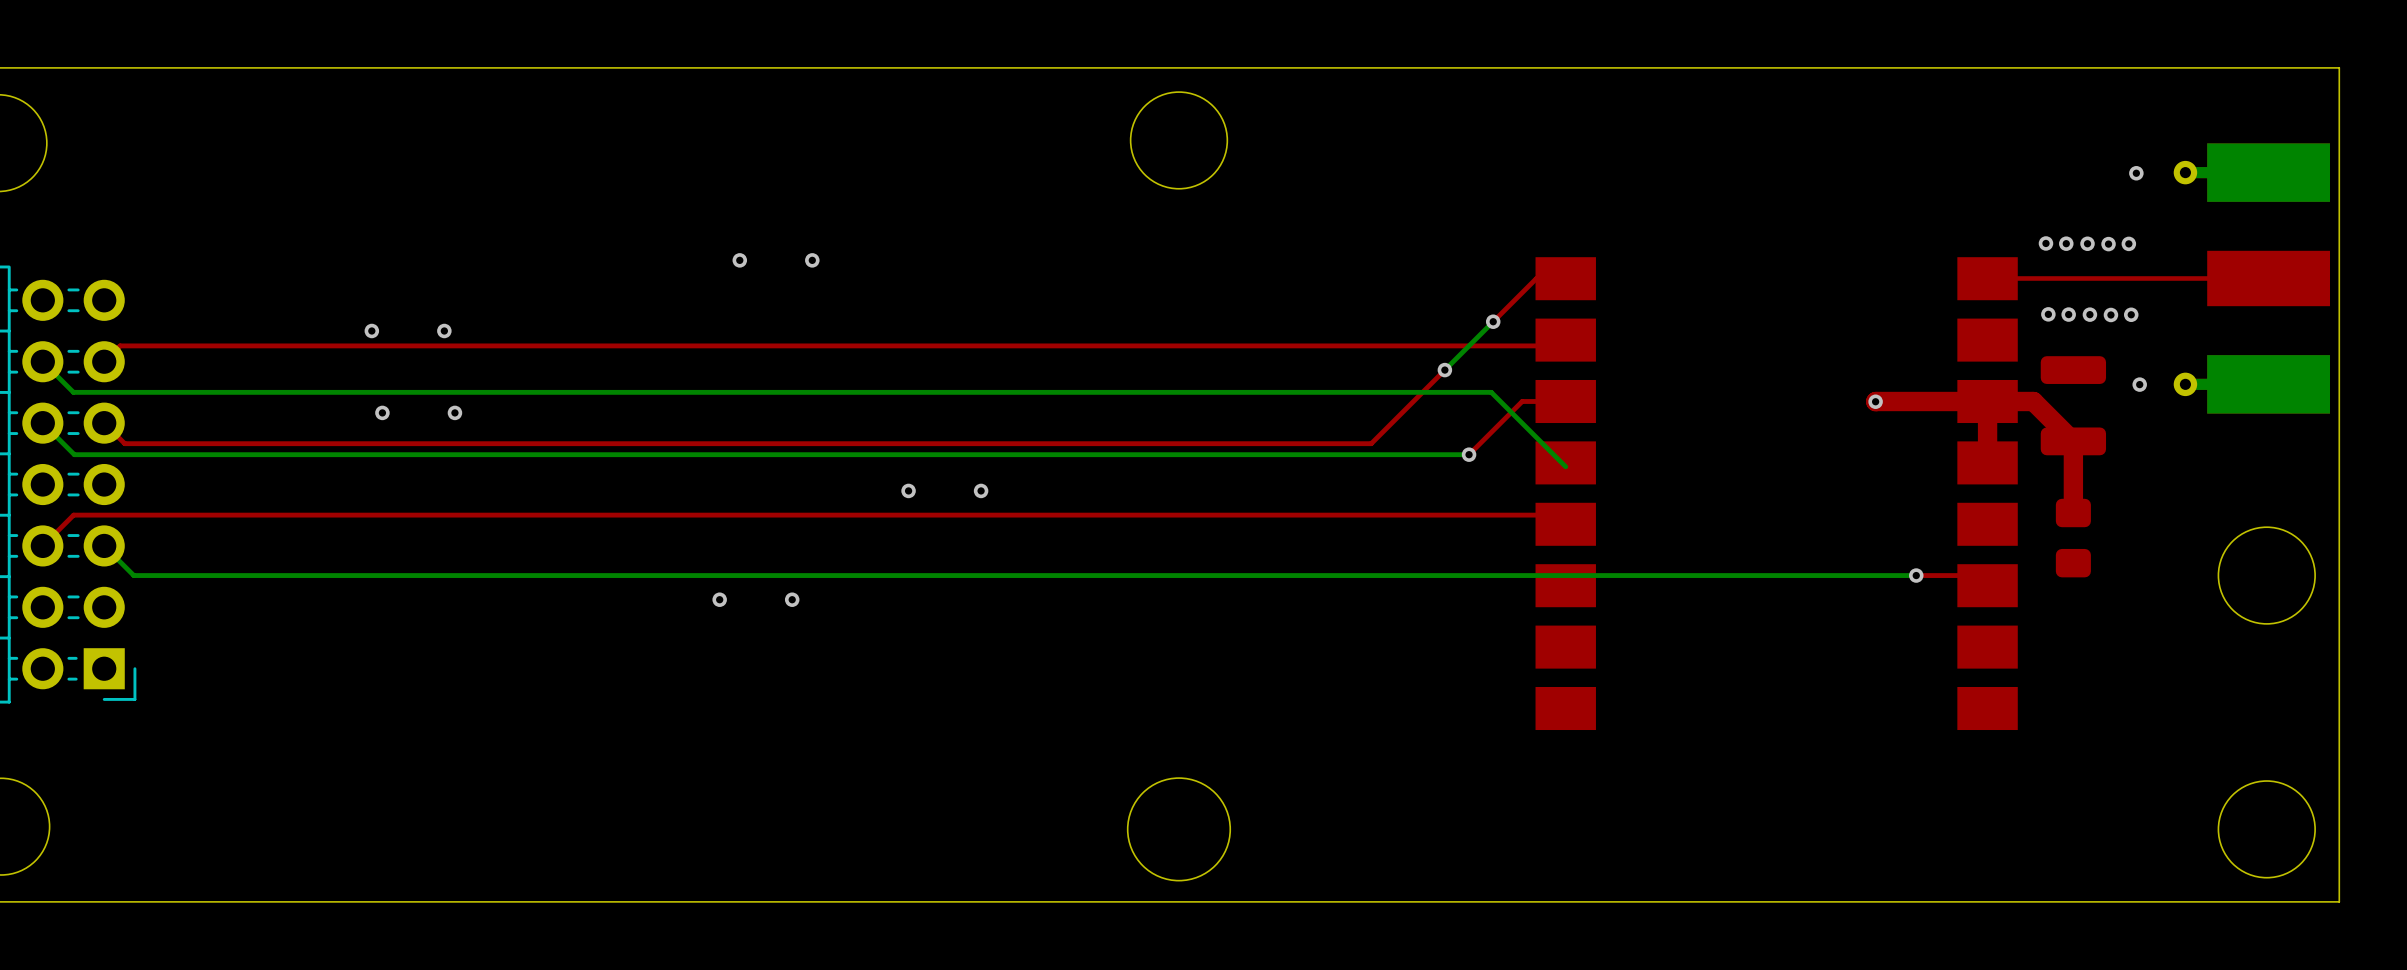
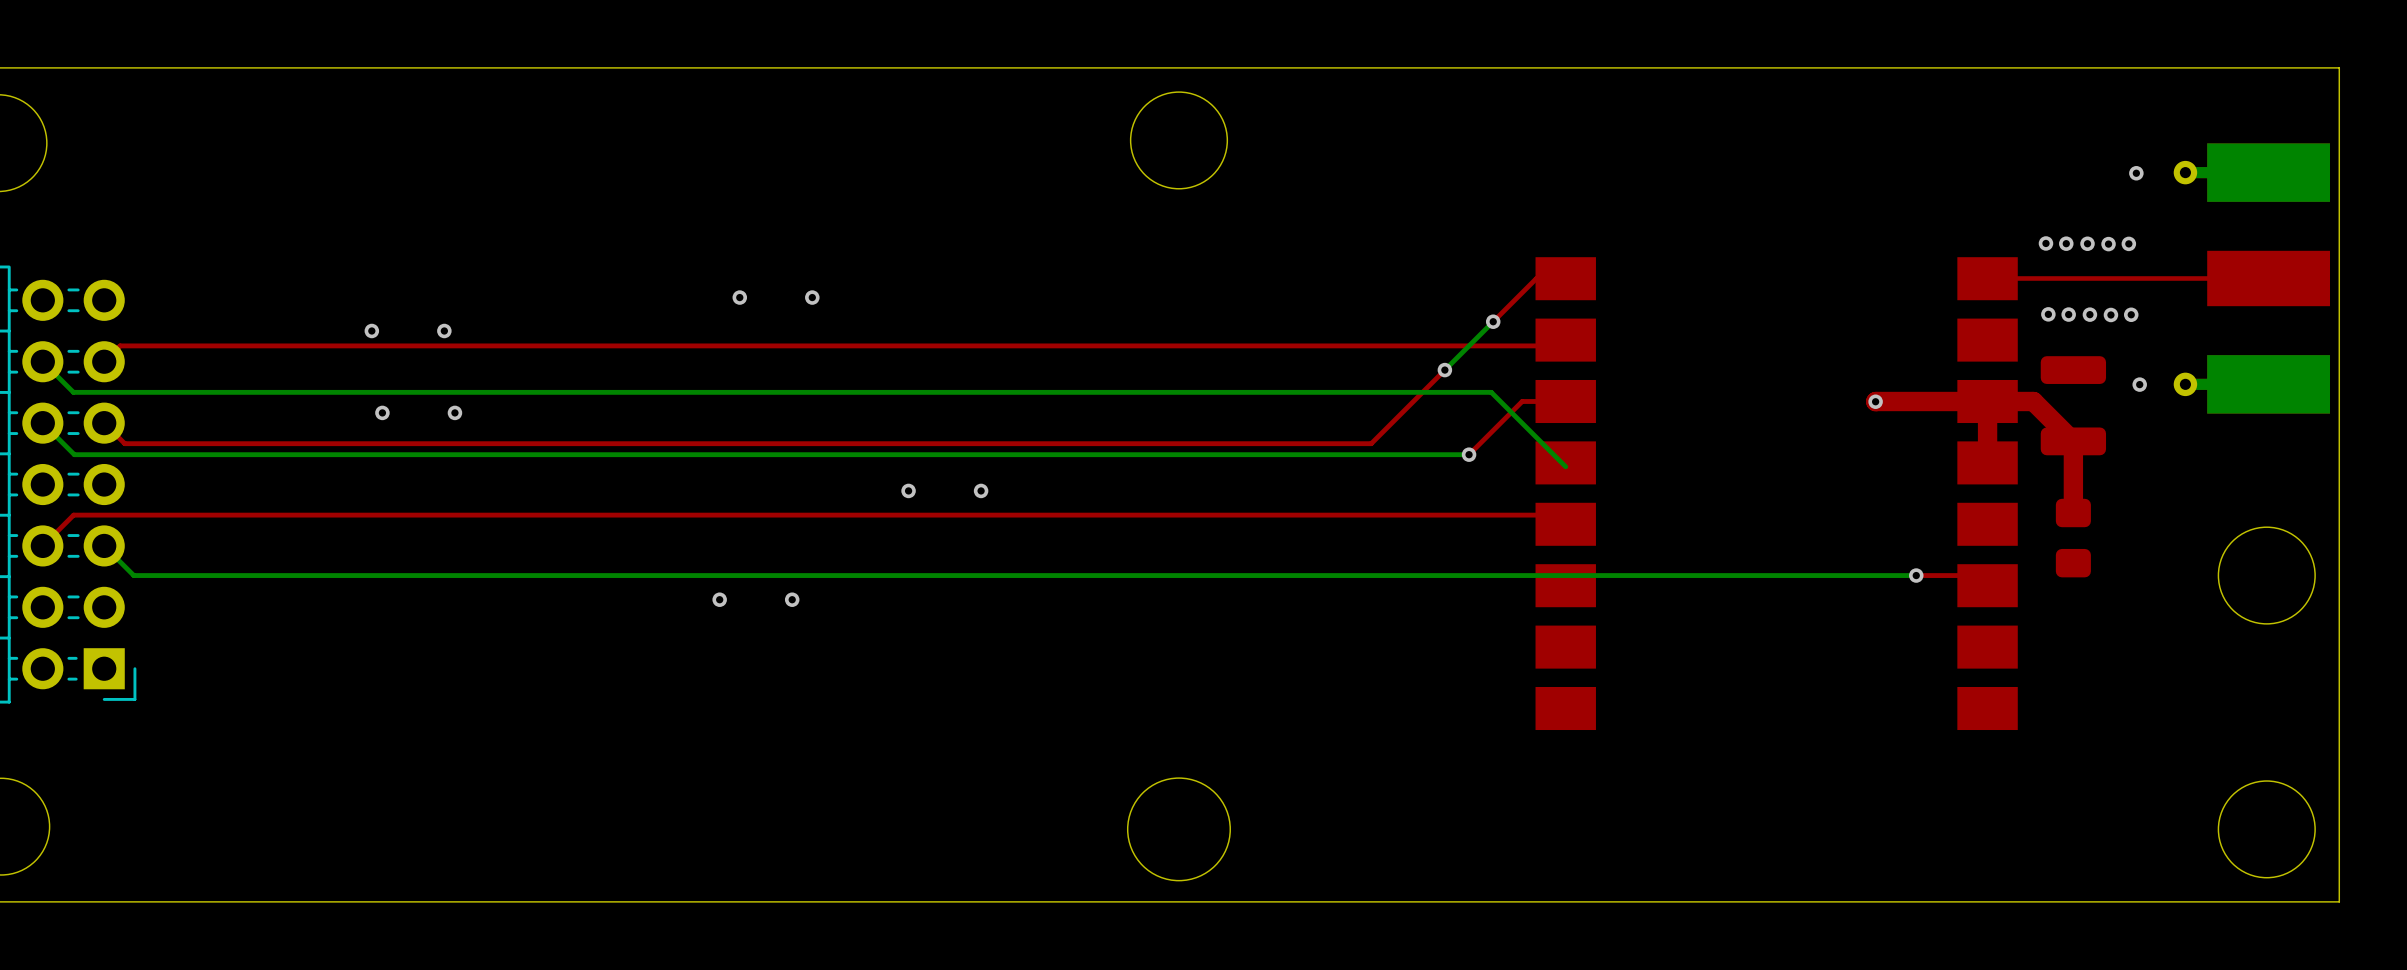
via position: (739, 260) -> (739, 297)
via position: (812, 260) -> (812, 297)

